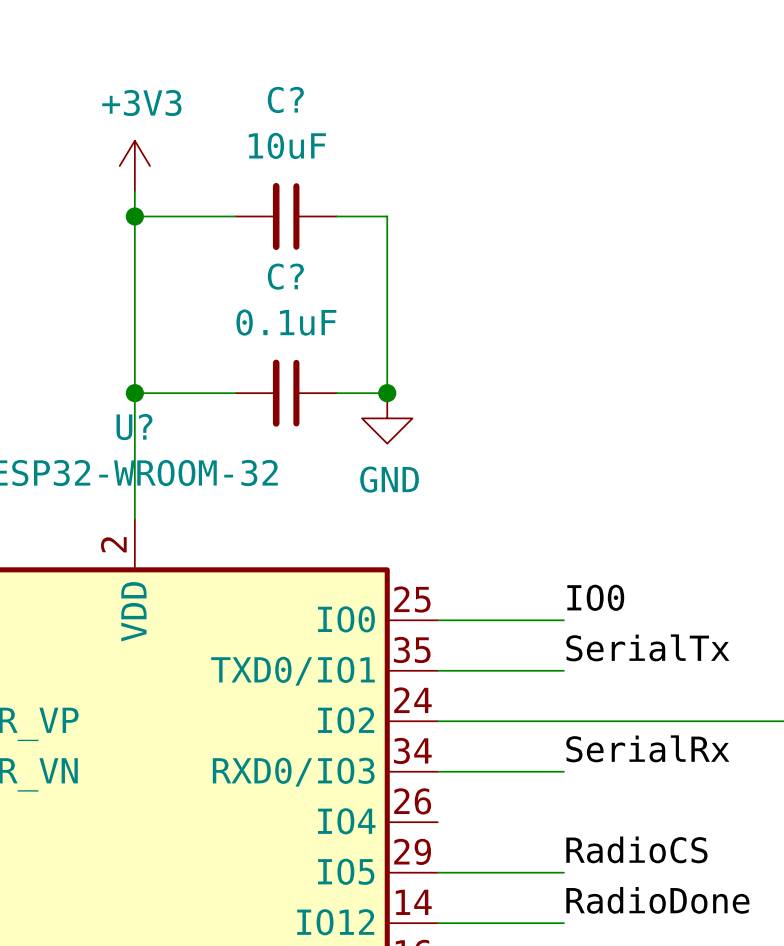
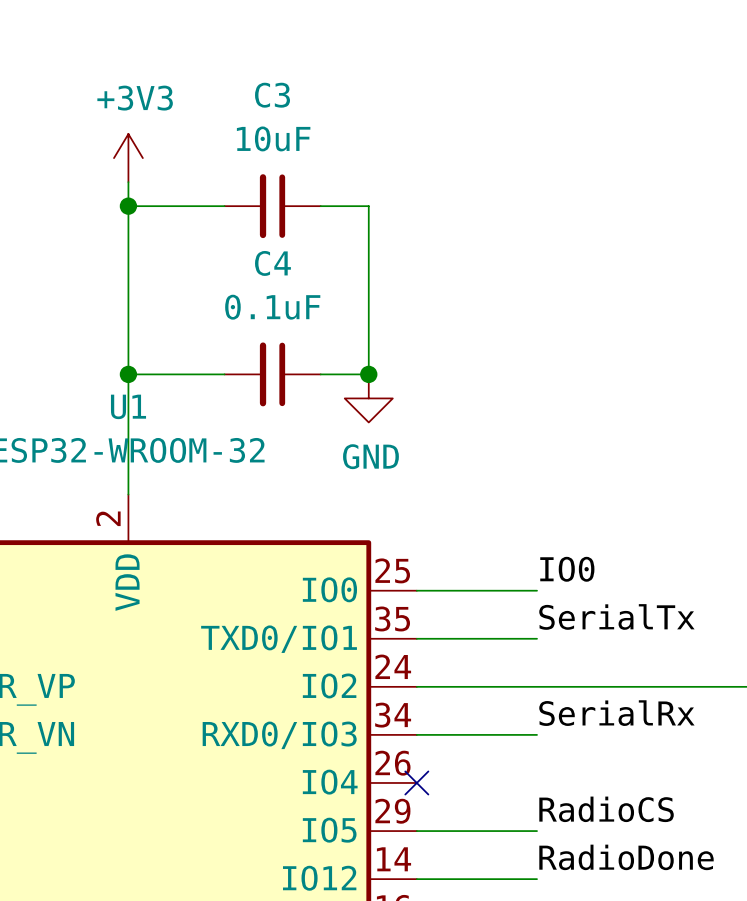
C? name: C? (285, 99) -> C3 (272, 95)
C? name: C? (285, 276) -> C4 (272, 263)
U? name: U? (134, 427) -> U1 (128, 406)
no-connect mark: none -> (416, 782)

